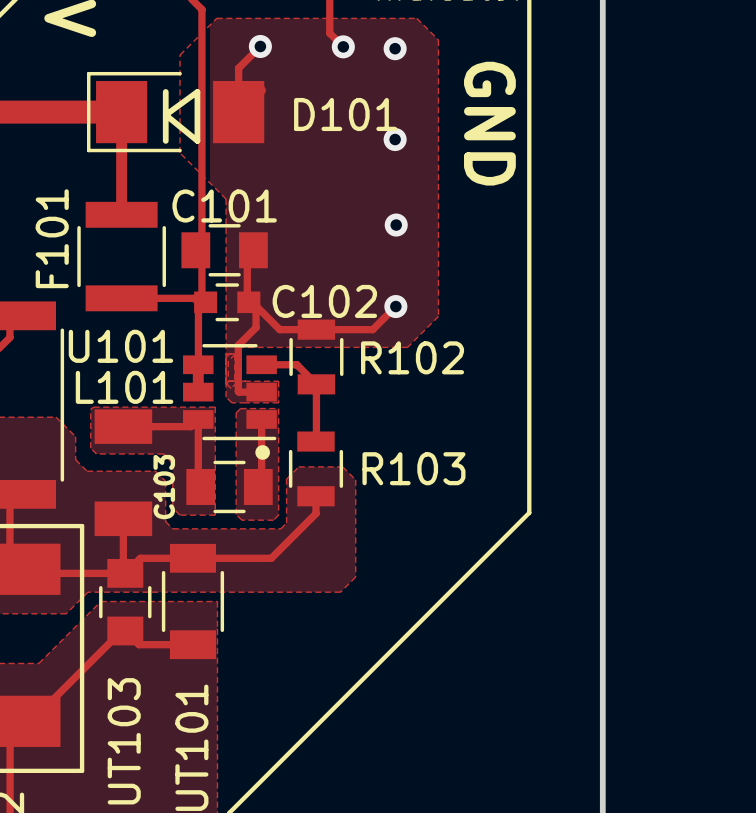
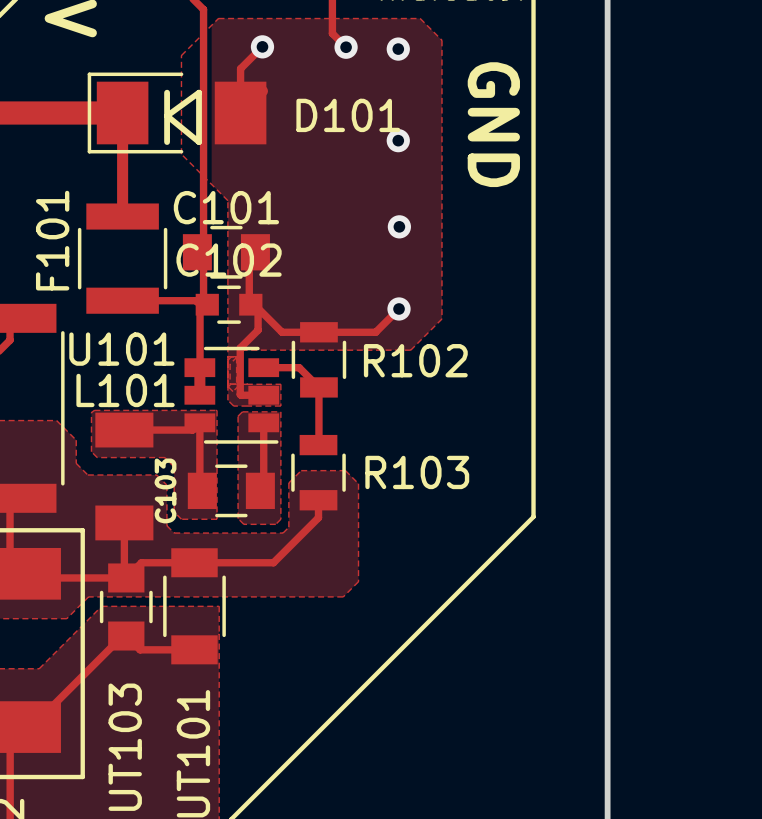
C102 name position: C102 (324, 301) -> C102 (229, 260)
drawing: [255, 445, 270, 460] -> none

